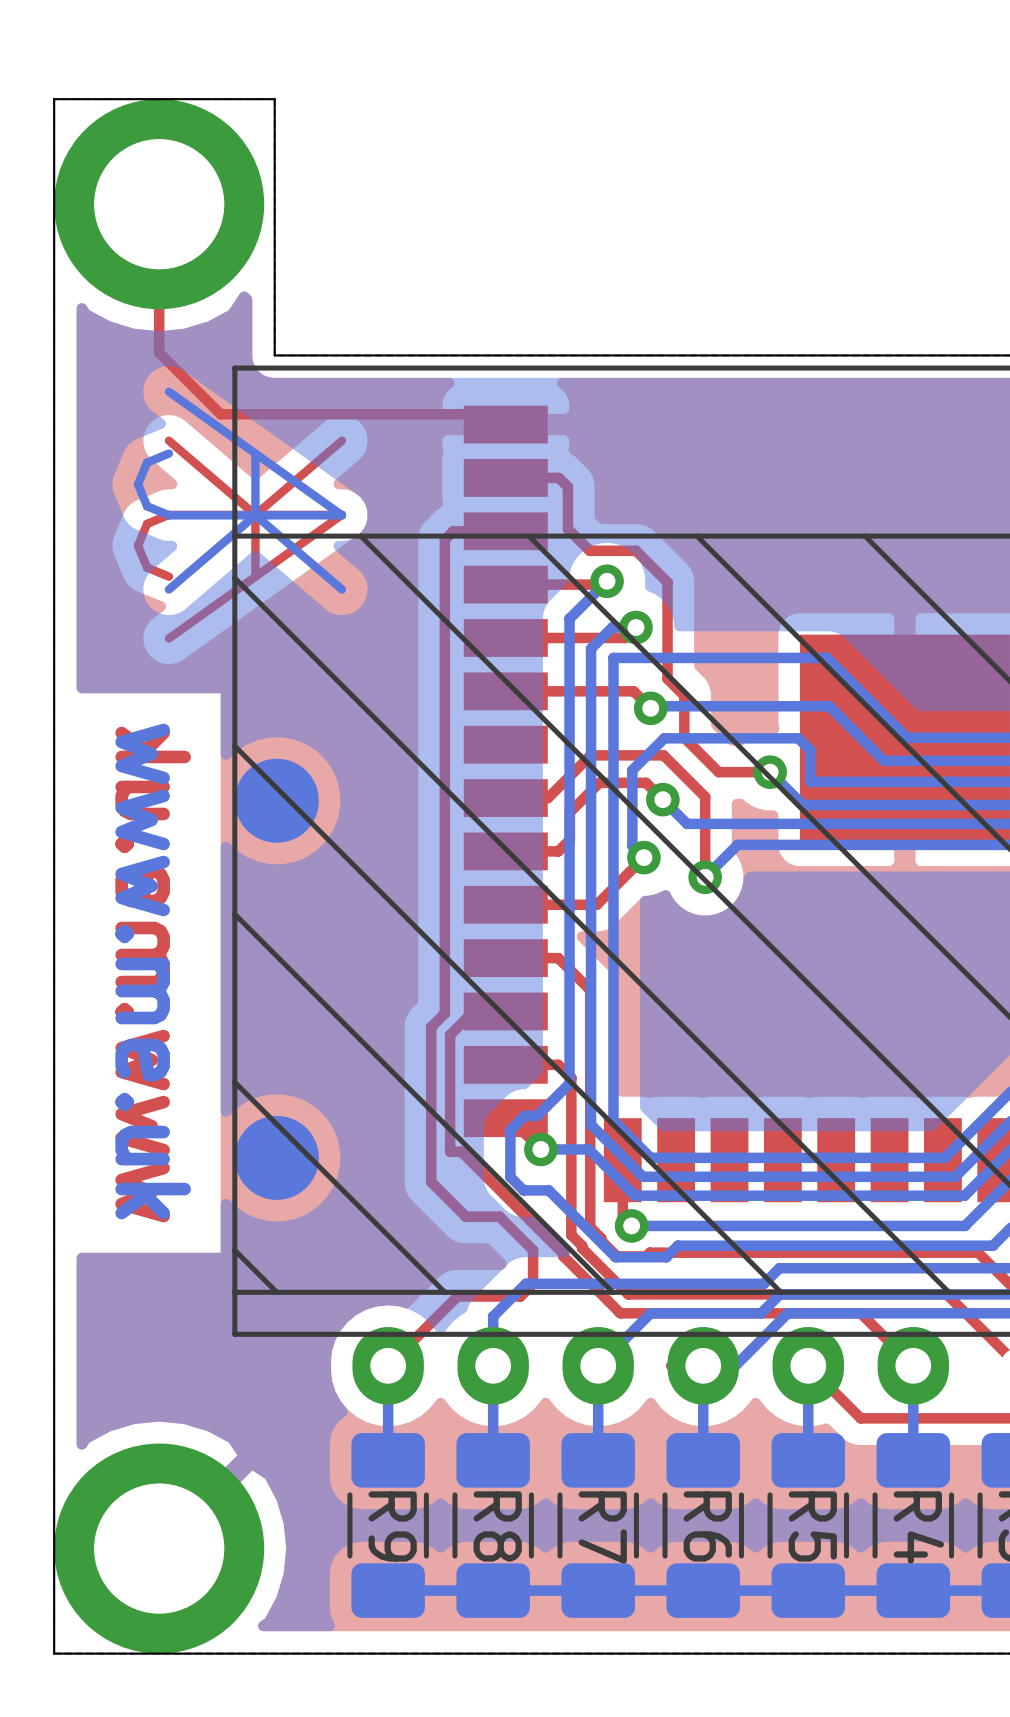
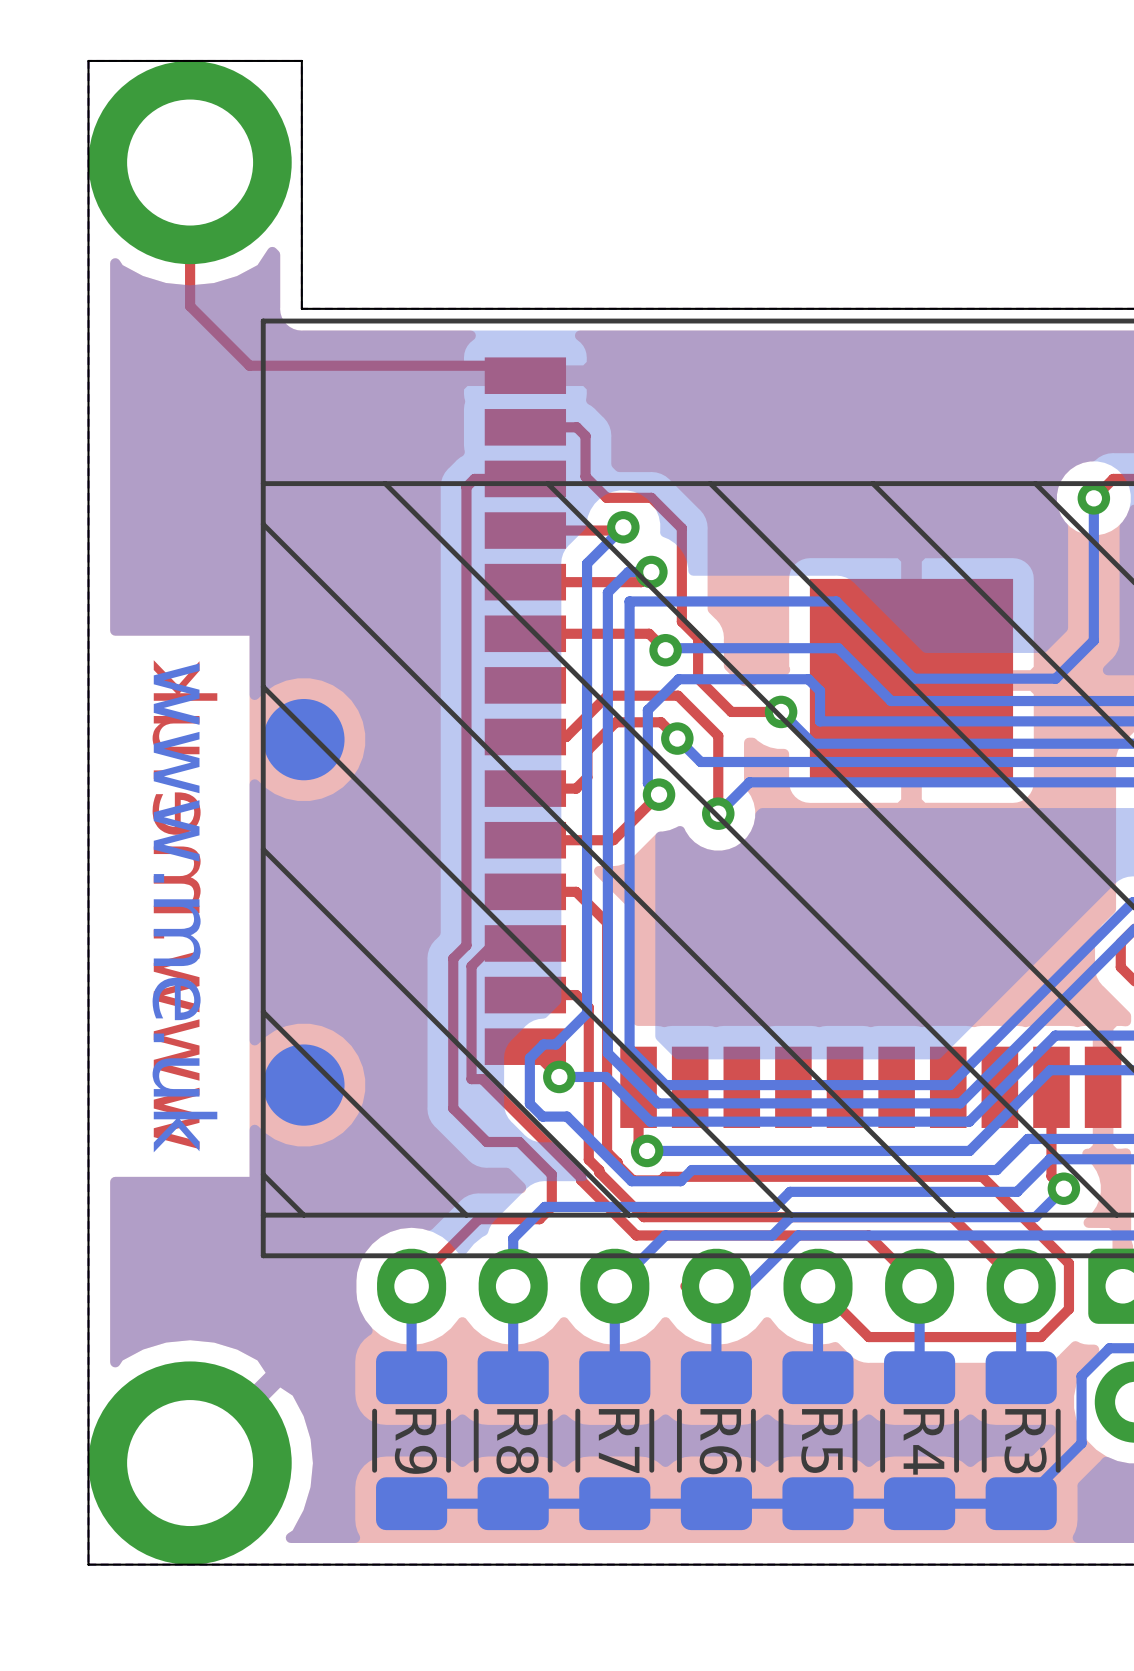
drawing: [133, 387, 347, 643] -> none

